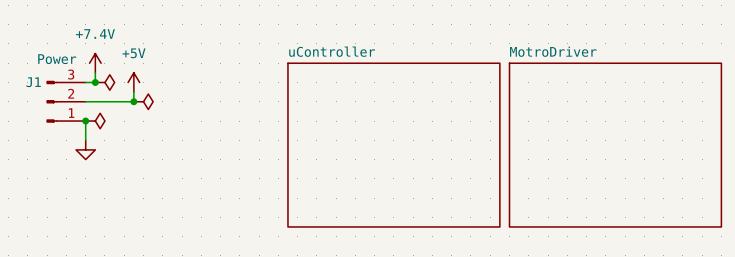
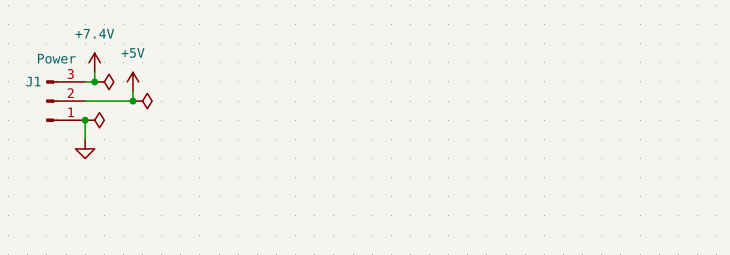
sheet uController: (393, 145) -> none
sheet MotroDriver: (615, 145) -> none

